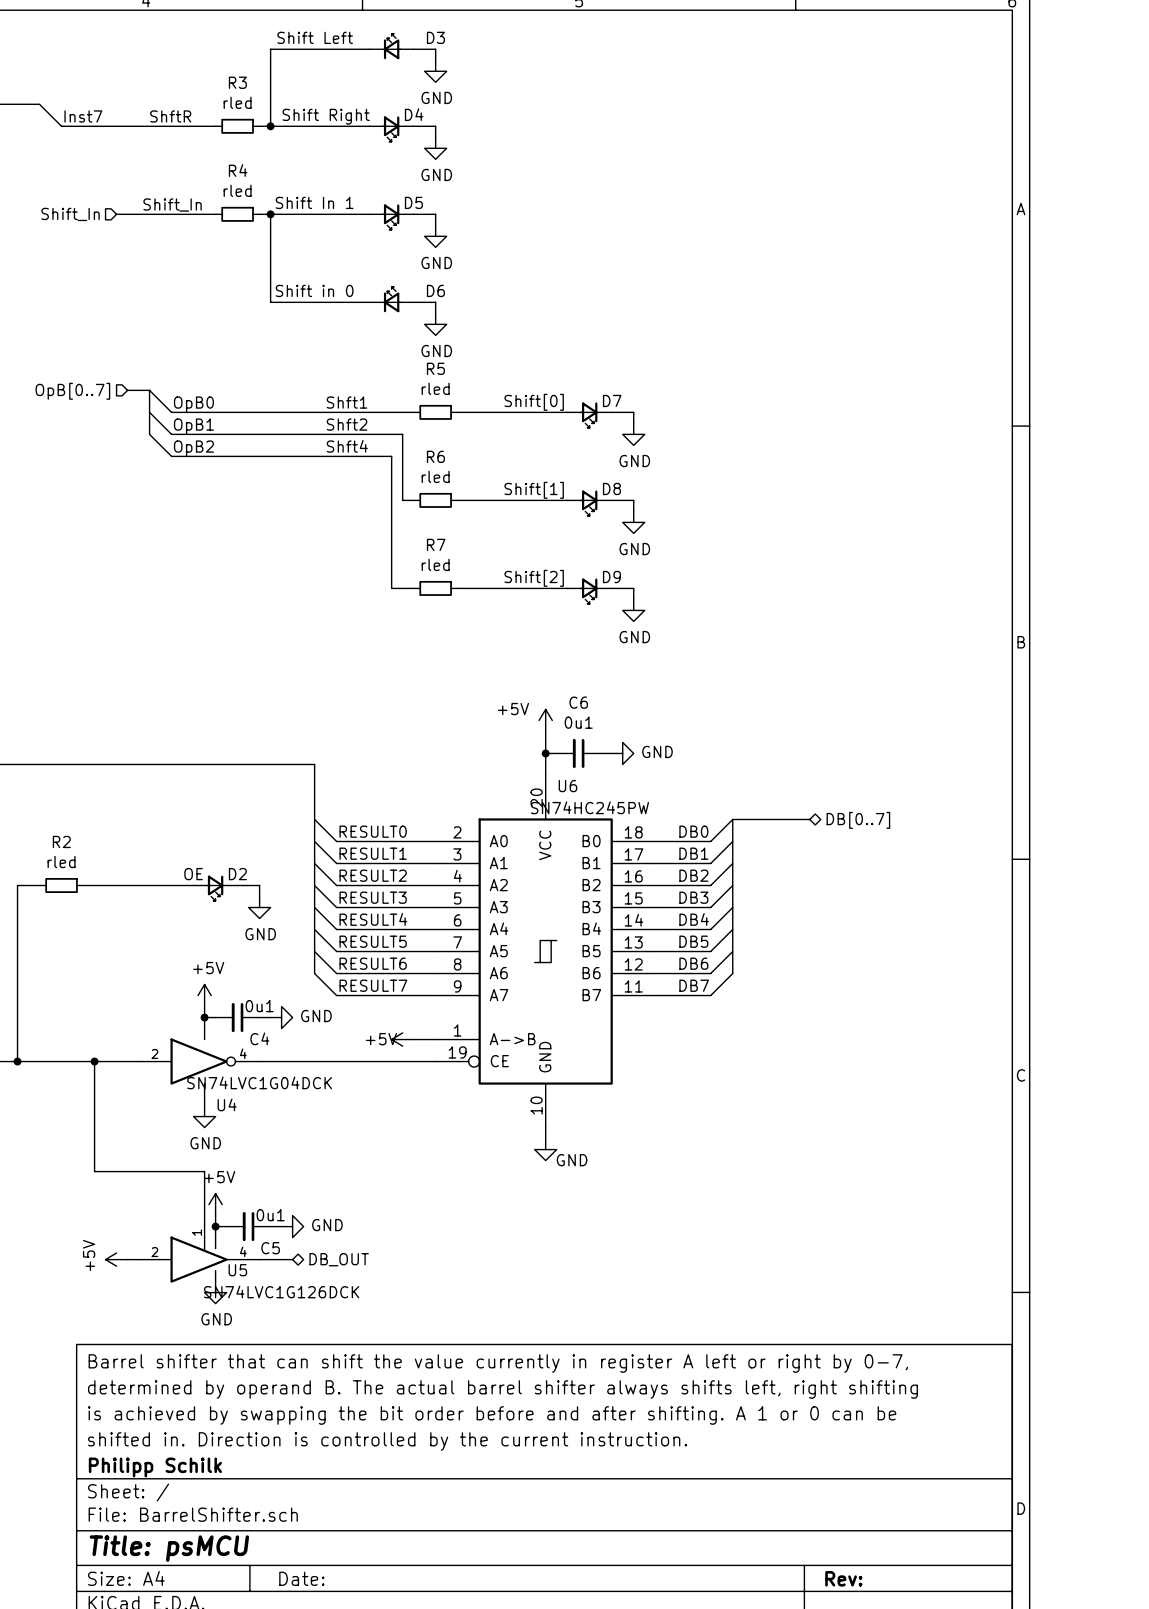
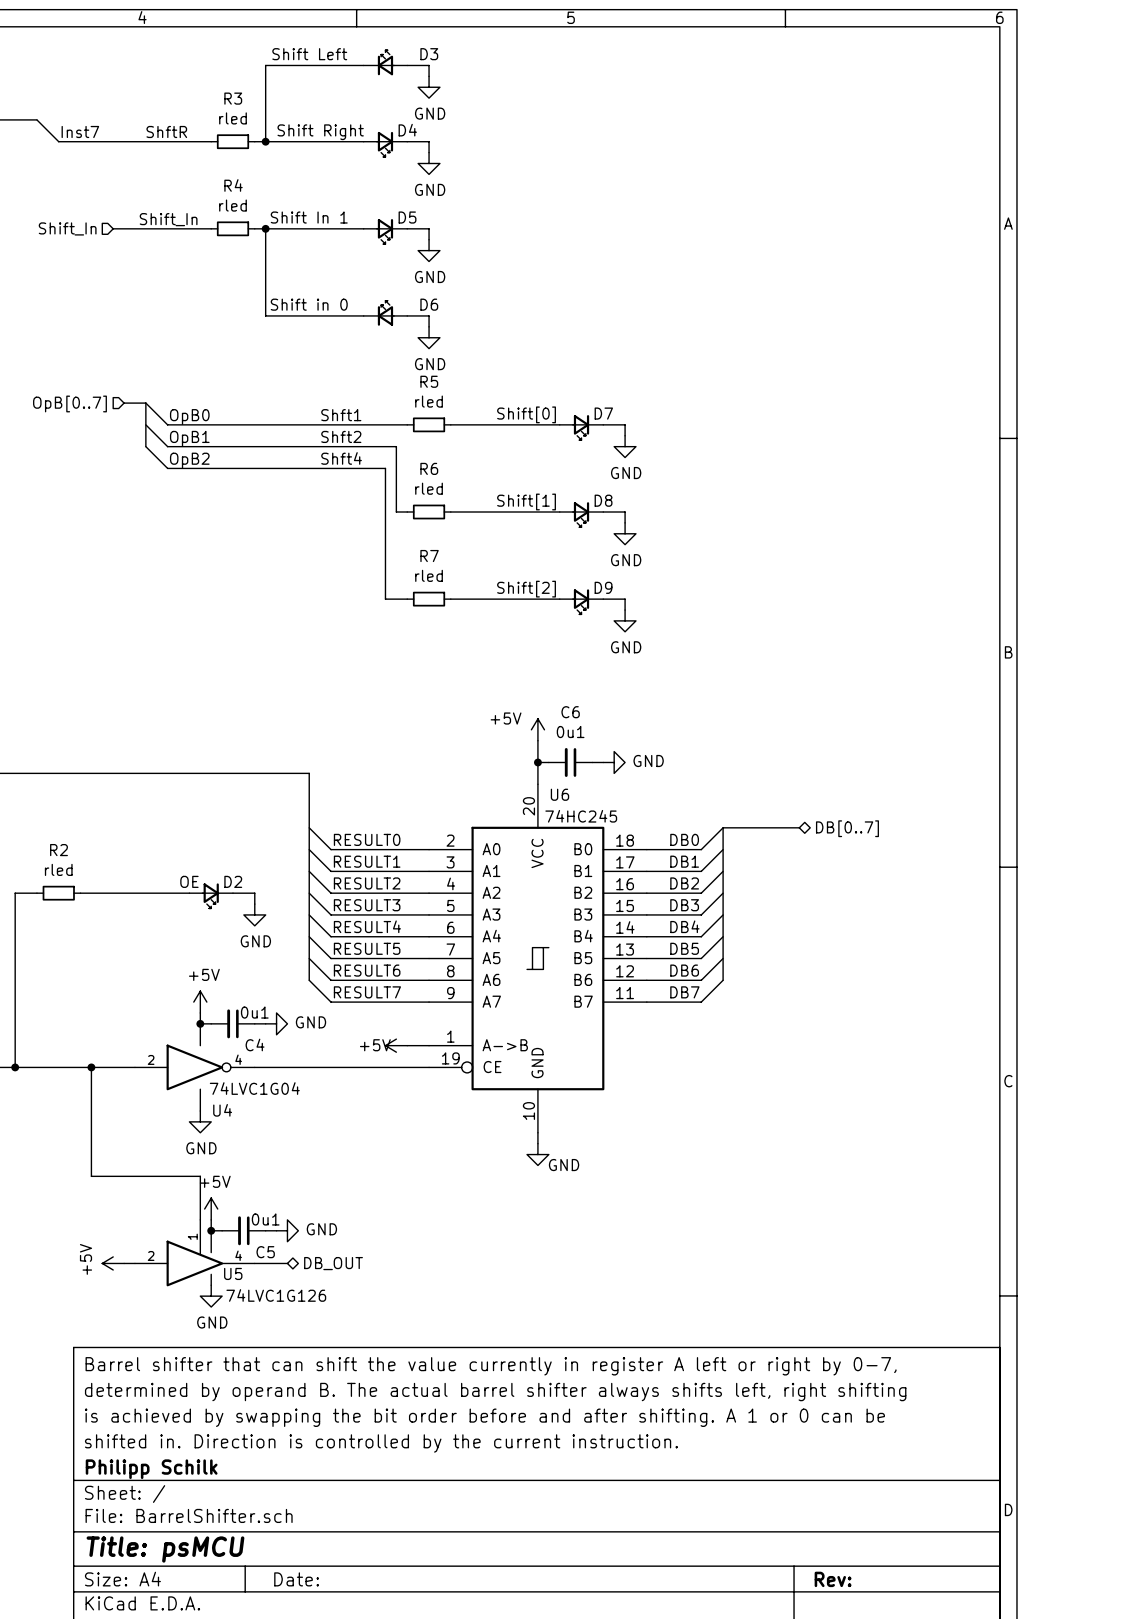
U6 value: SN74HC245PW (589, 807) -> 74HC245 (581, 816)
U4 value: SN74LVC1G04DCK (259, 1082) -> 74LVC1G04 (254, 1088)
U5 value: SN74LVC1G126DCK (281, 1291) -> 74LVC1G126 (276, 1295)

